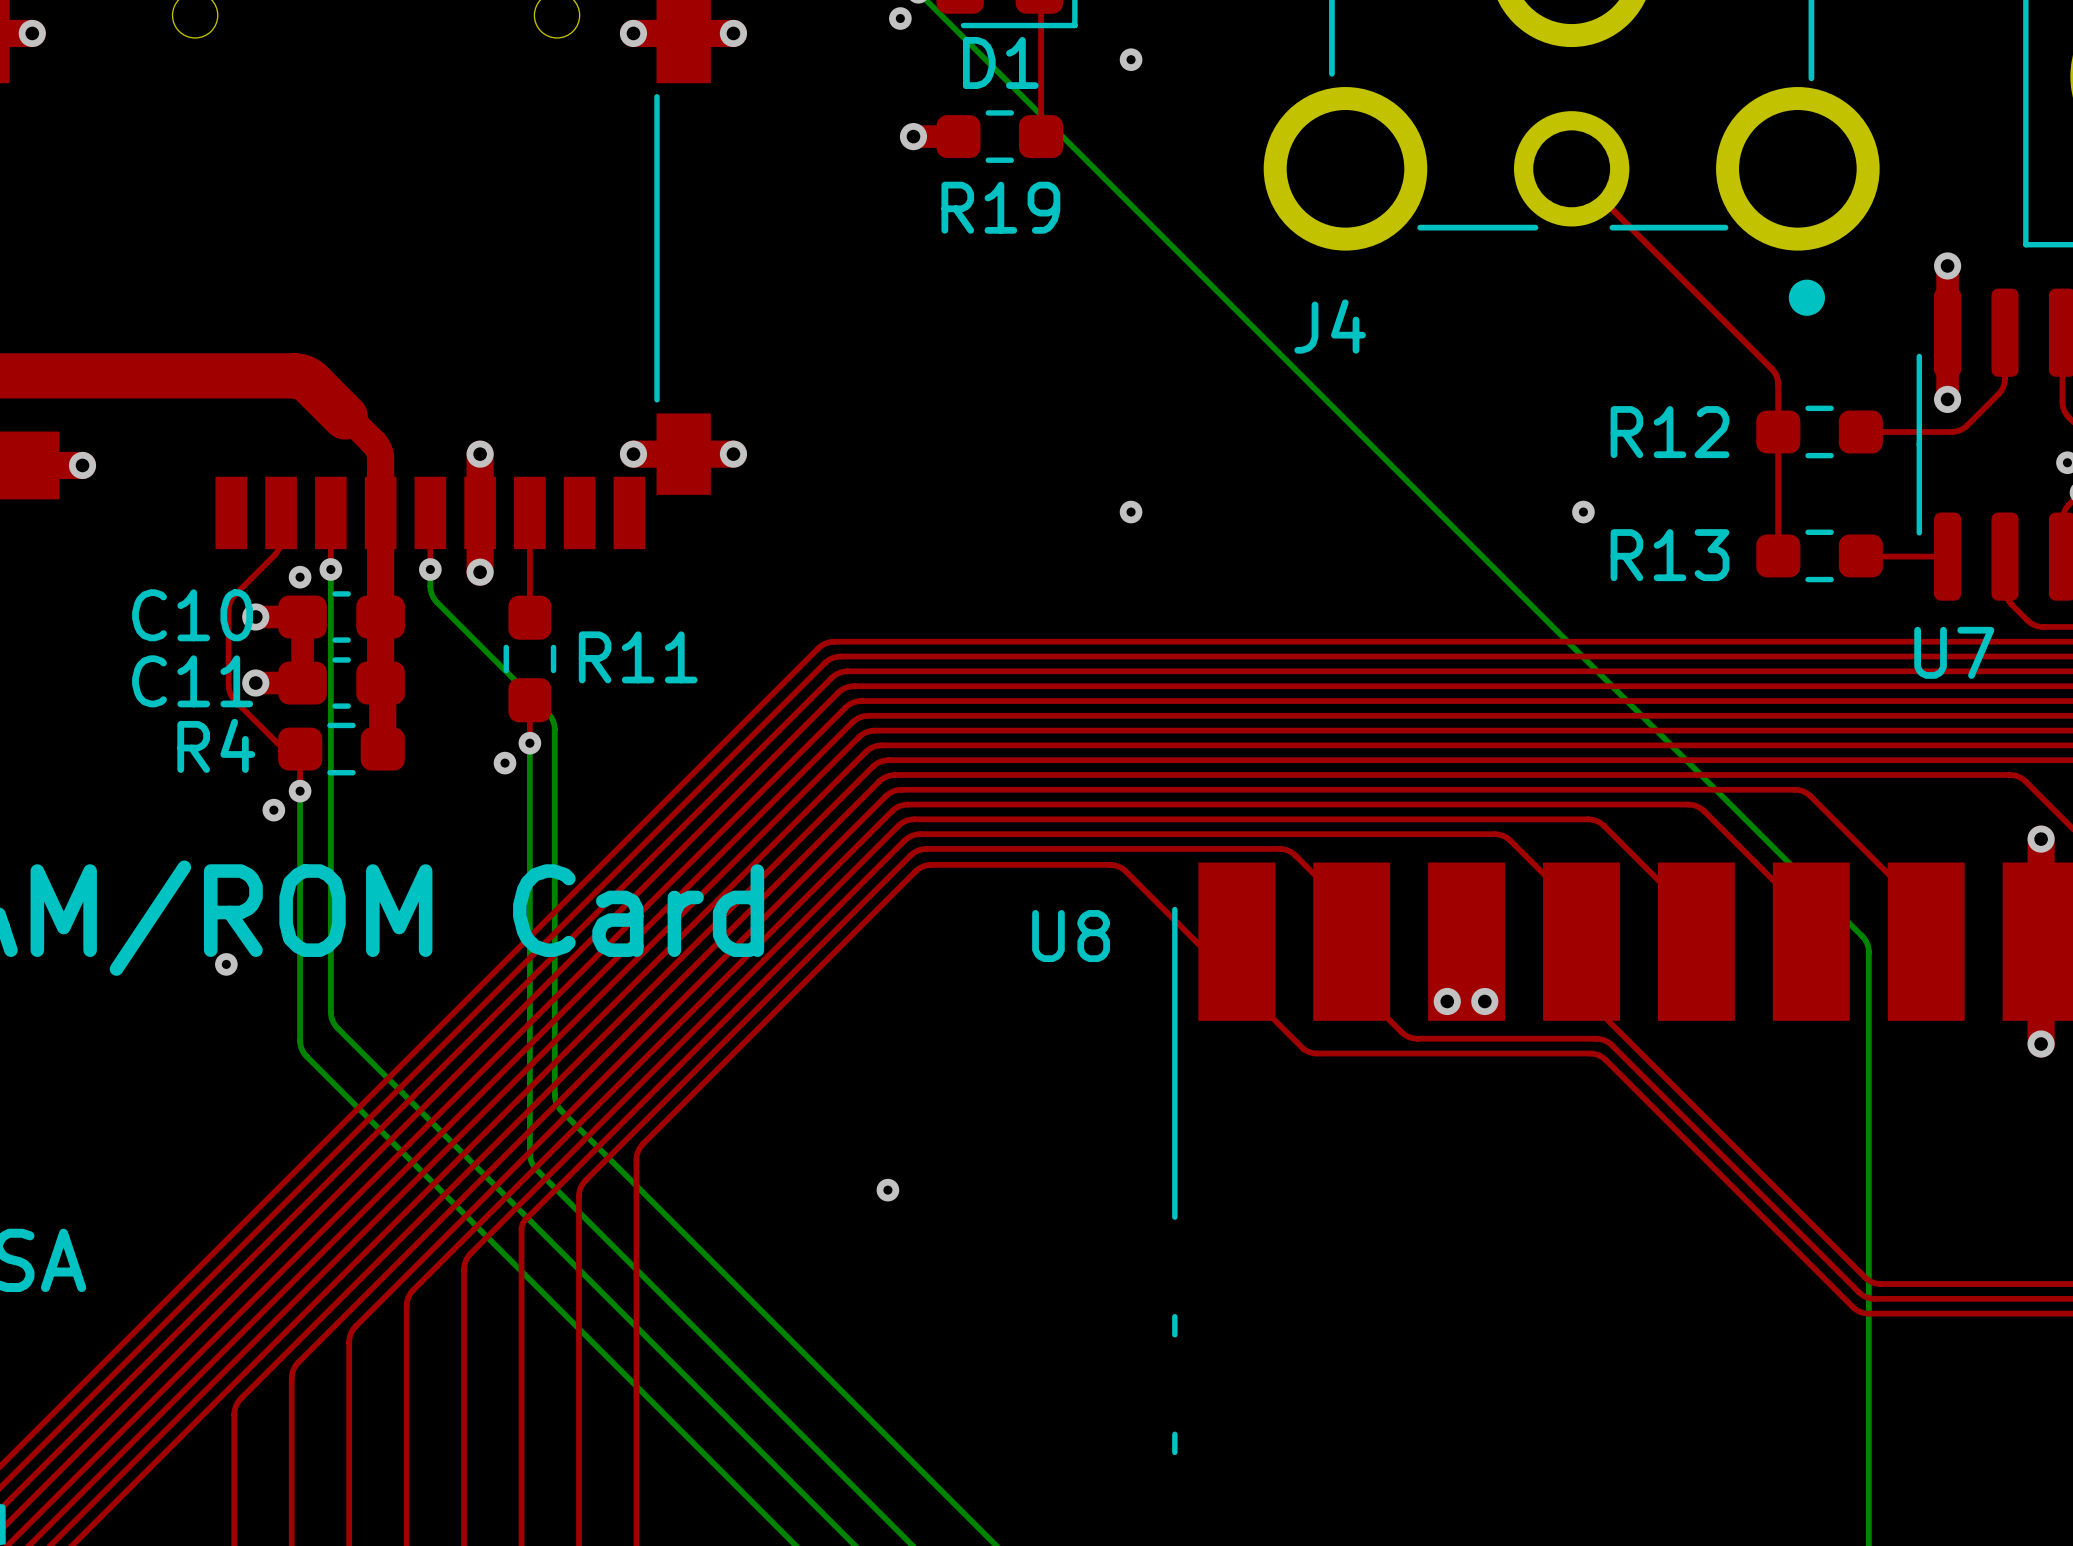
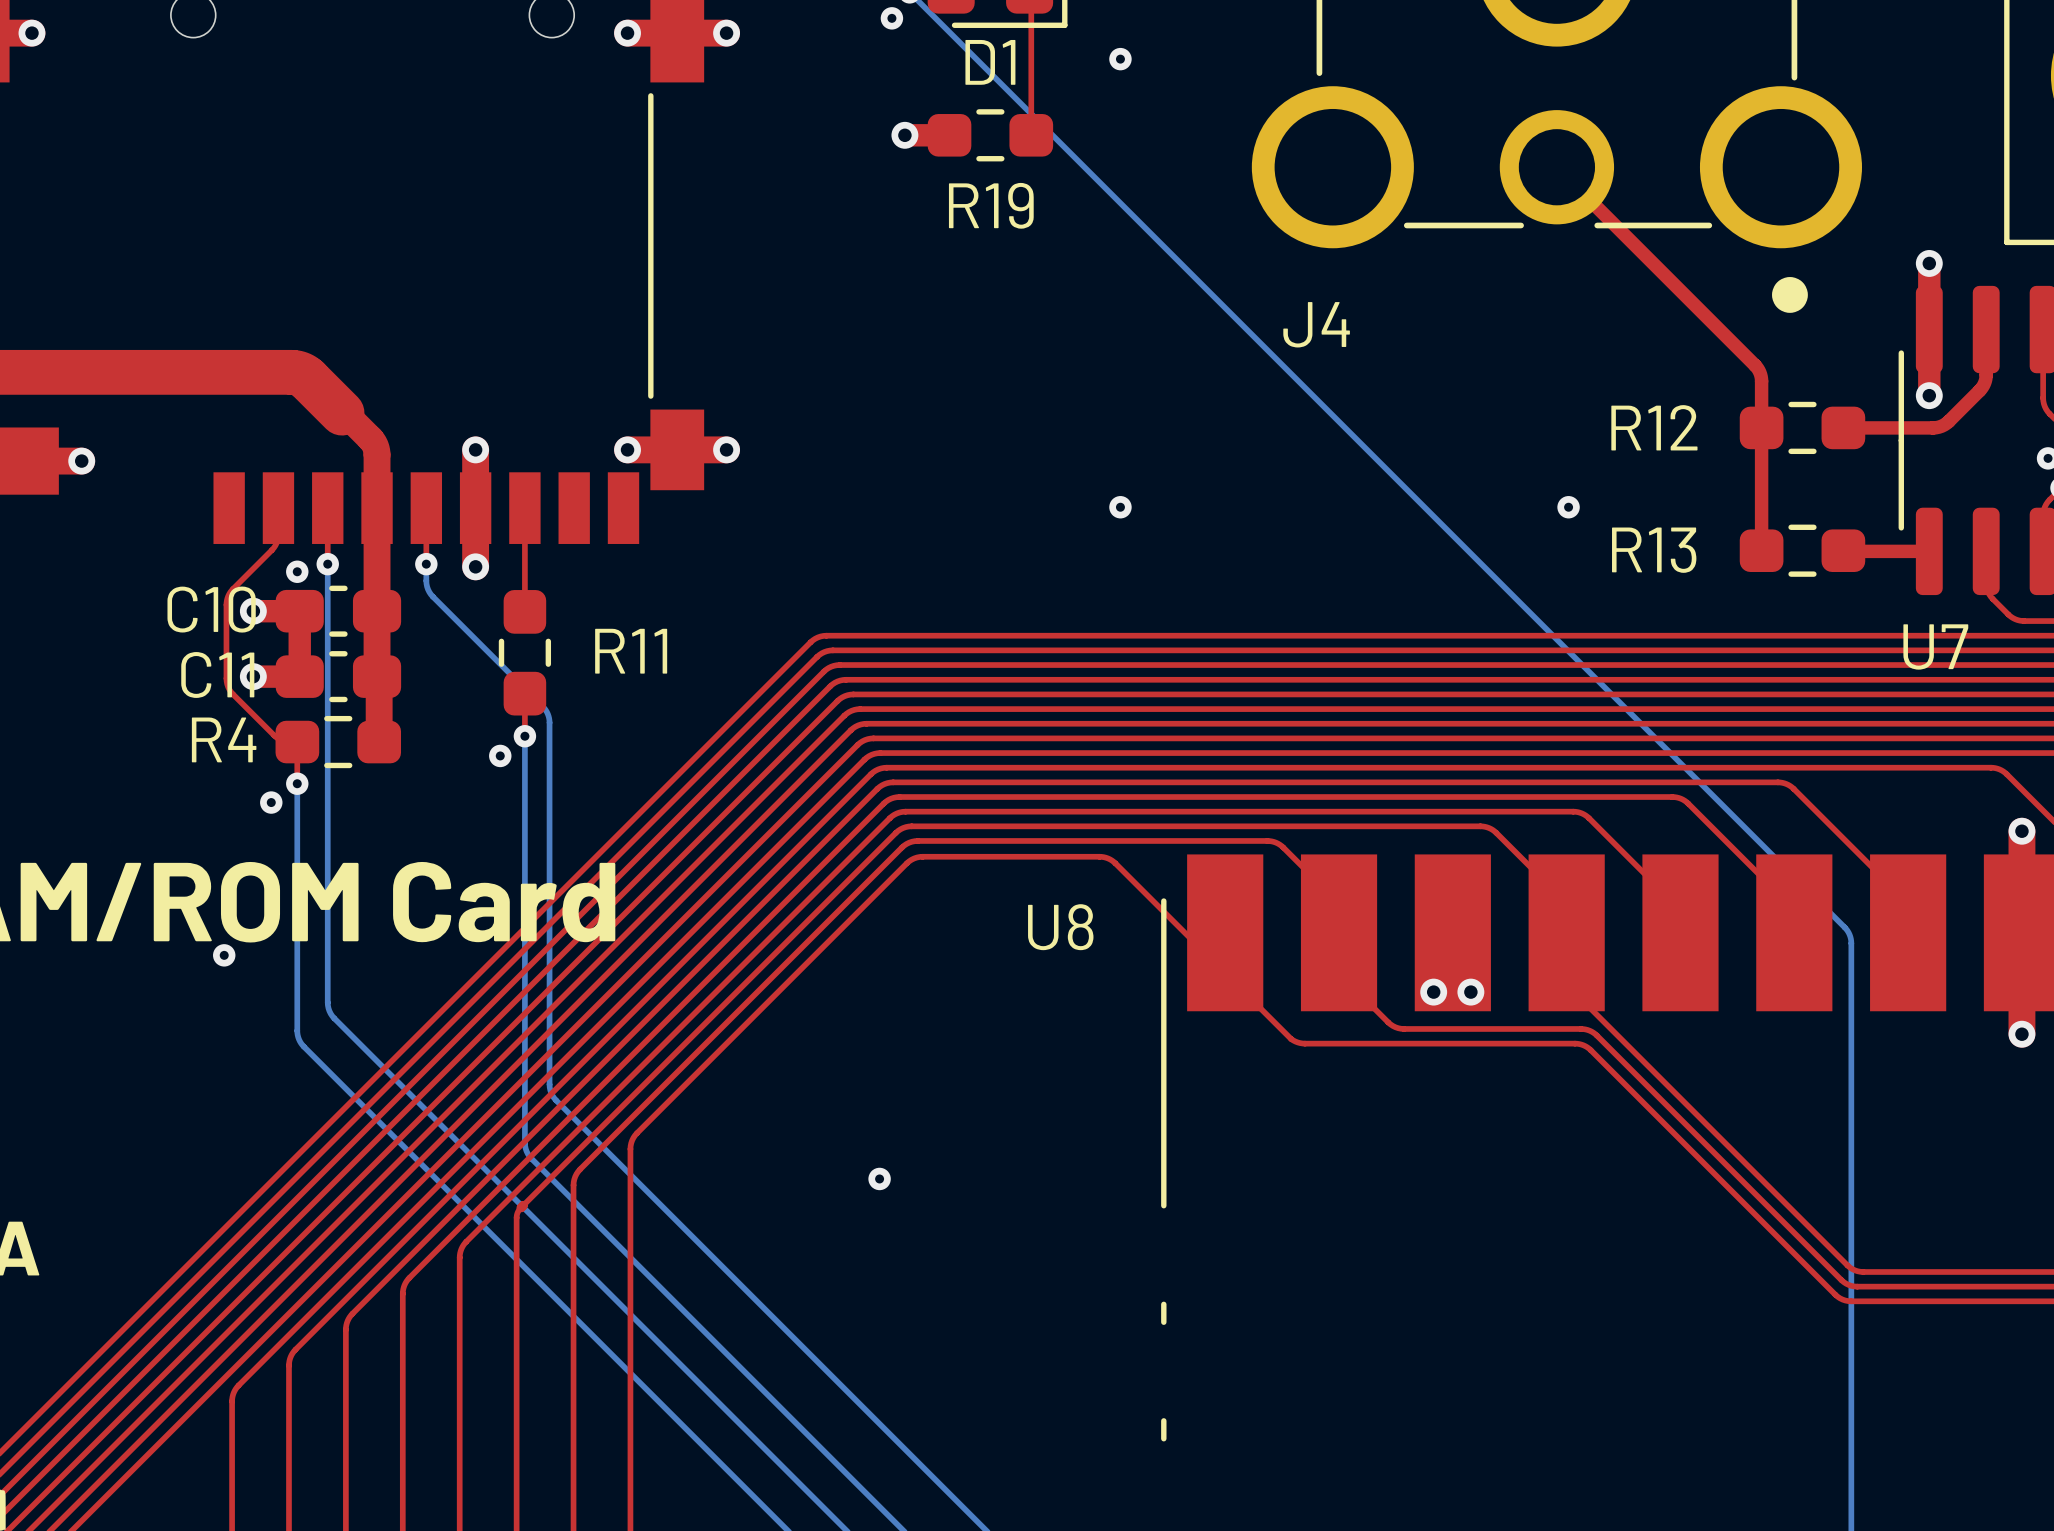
top track width: thin (1571, 168) (1775, 374) (1778, 384) (1778, 555) -> thick (1556, 167) (1758, 370) (1761, 381) (1761, 550)
top track width: thin (2005, 332) (2003, 386) (1965, 427) (1951, 431) (1860, 431) -> thick (1986, 329) (1984, 383) (1946, 423) (1933, 427) (1843, 427)
top track width: thin (1860, 555) (1947, 556) -> thick (1843, 550) (1929, 551)

